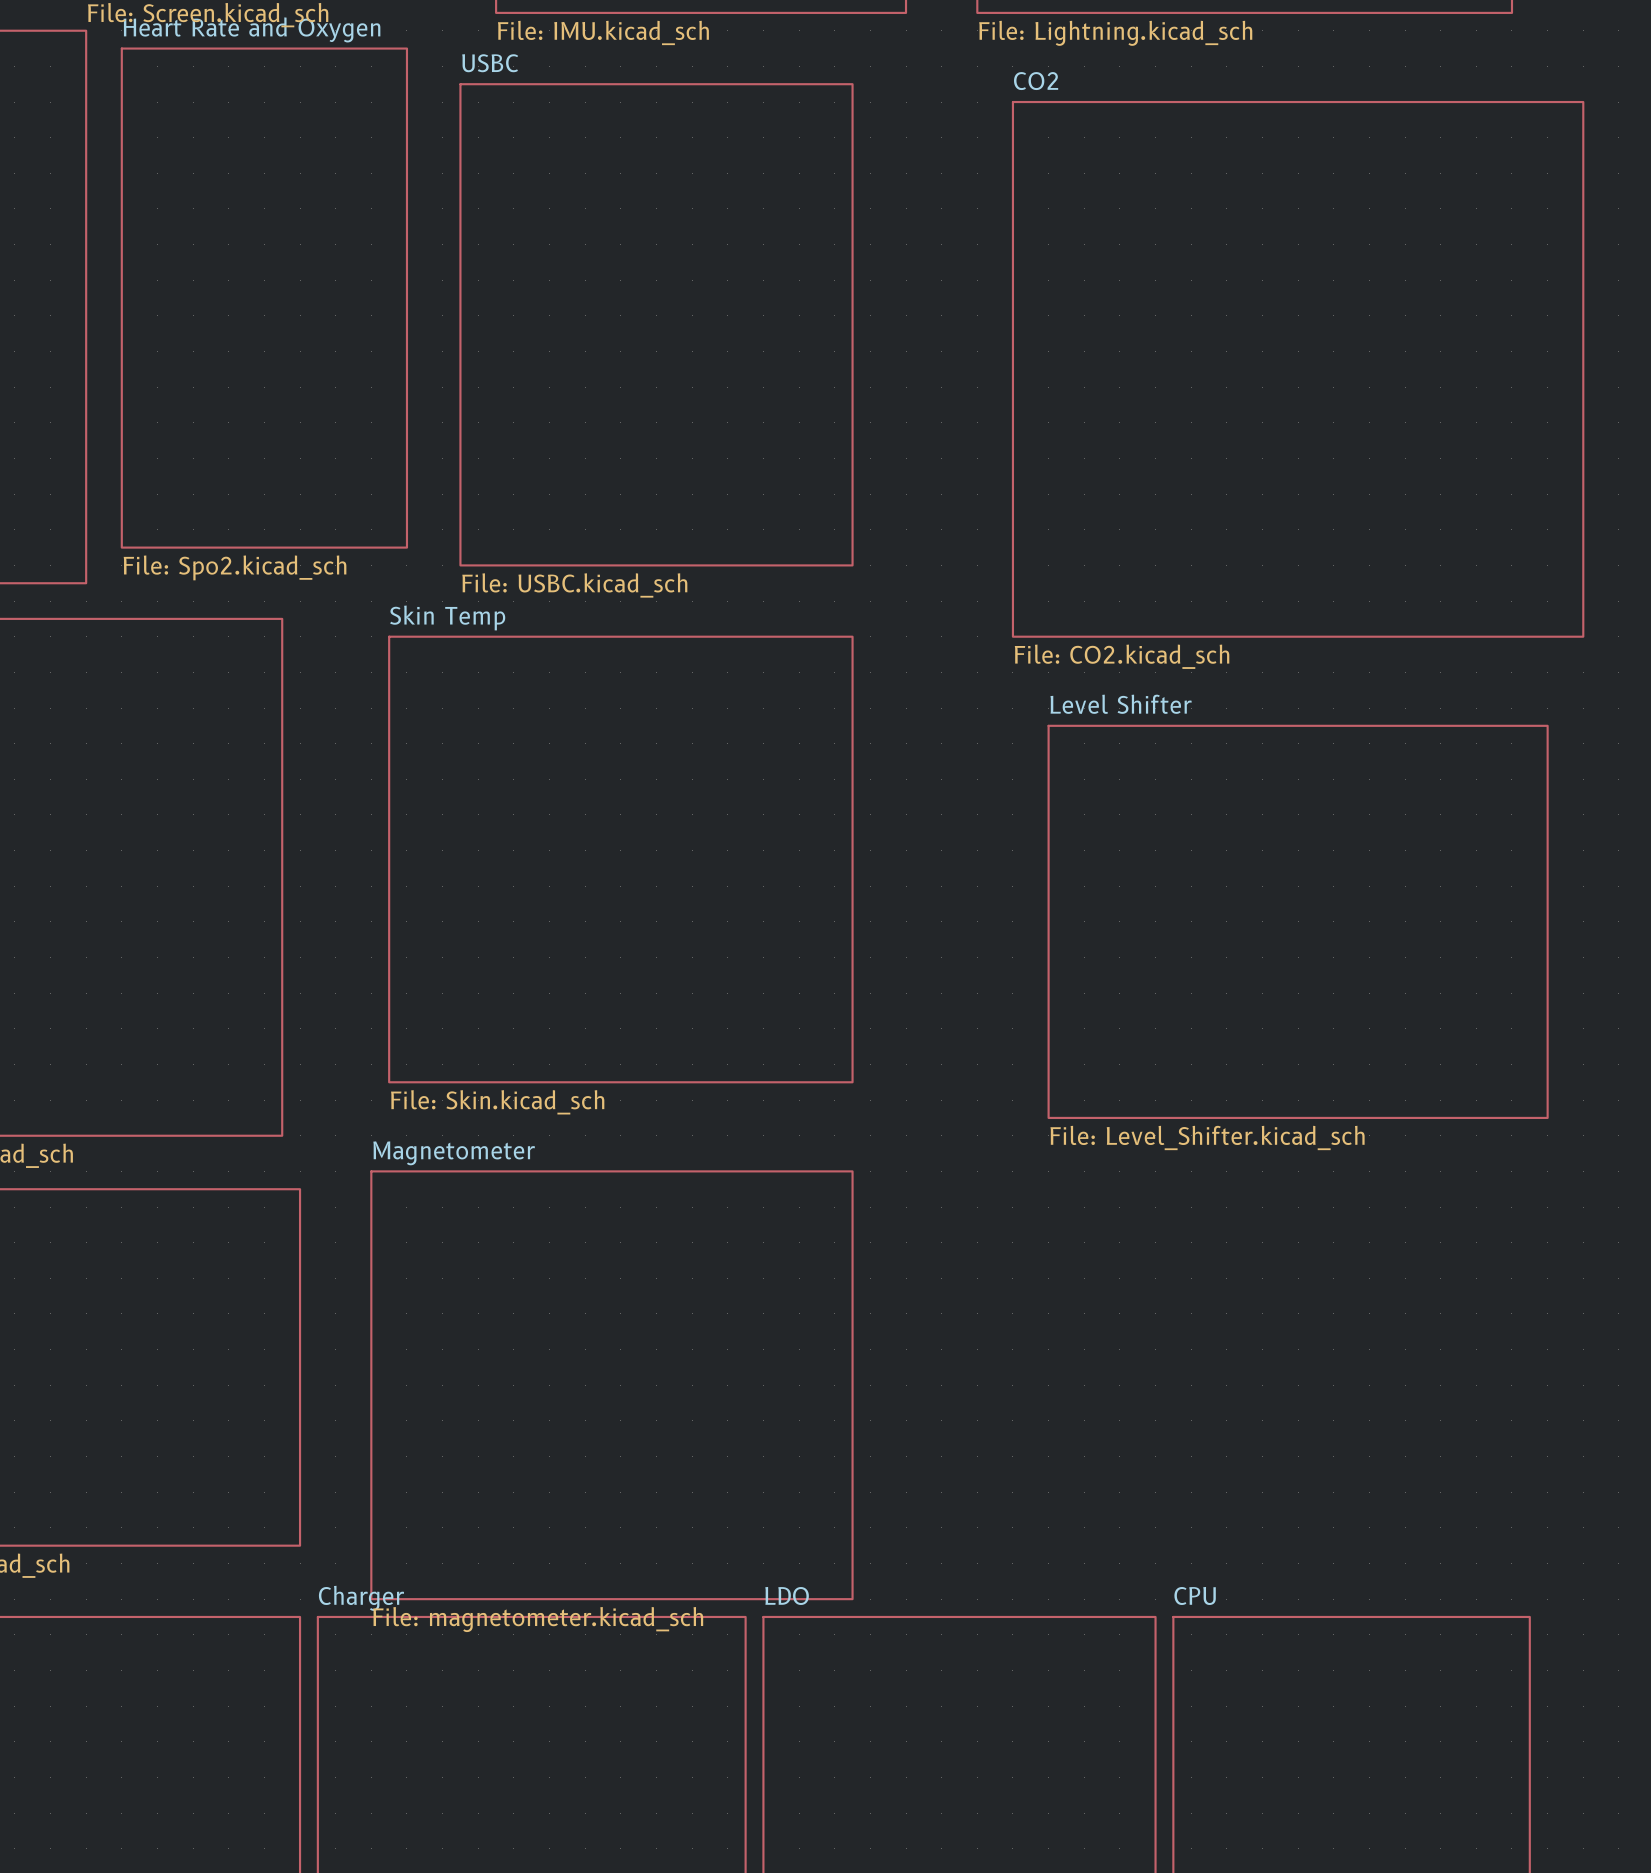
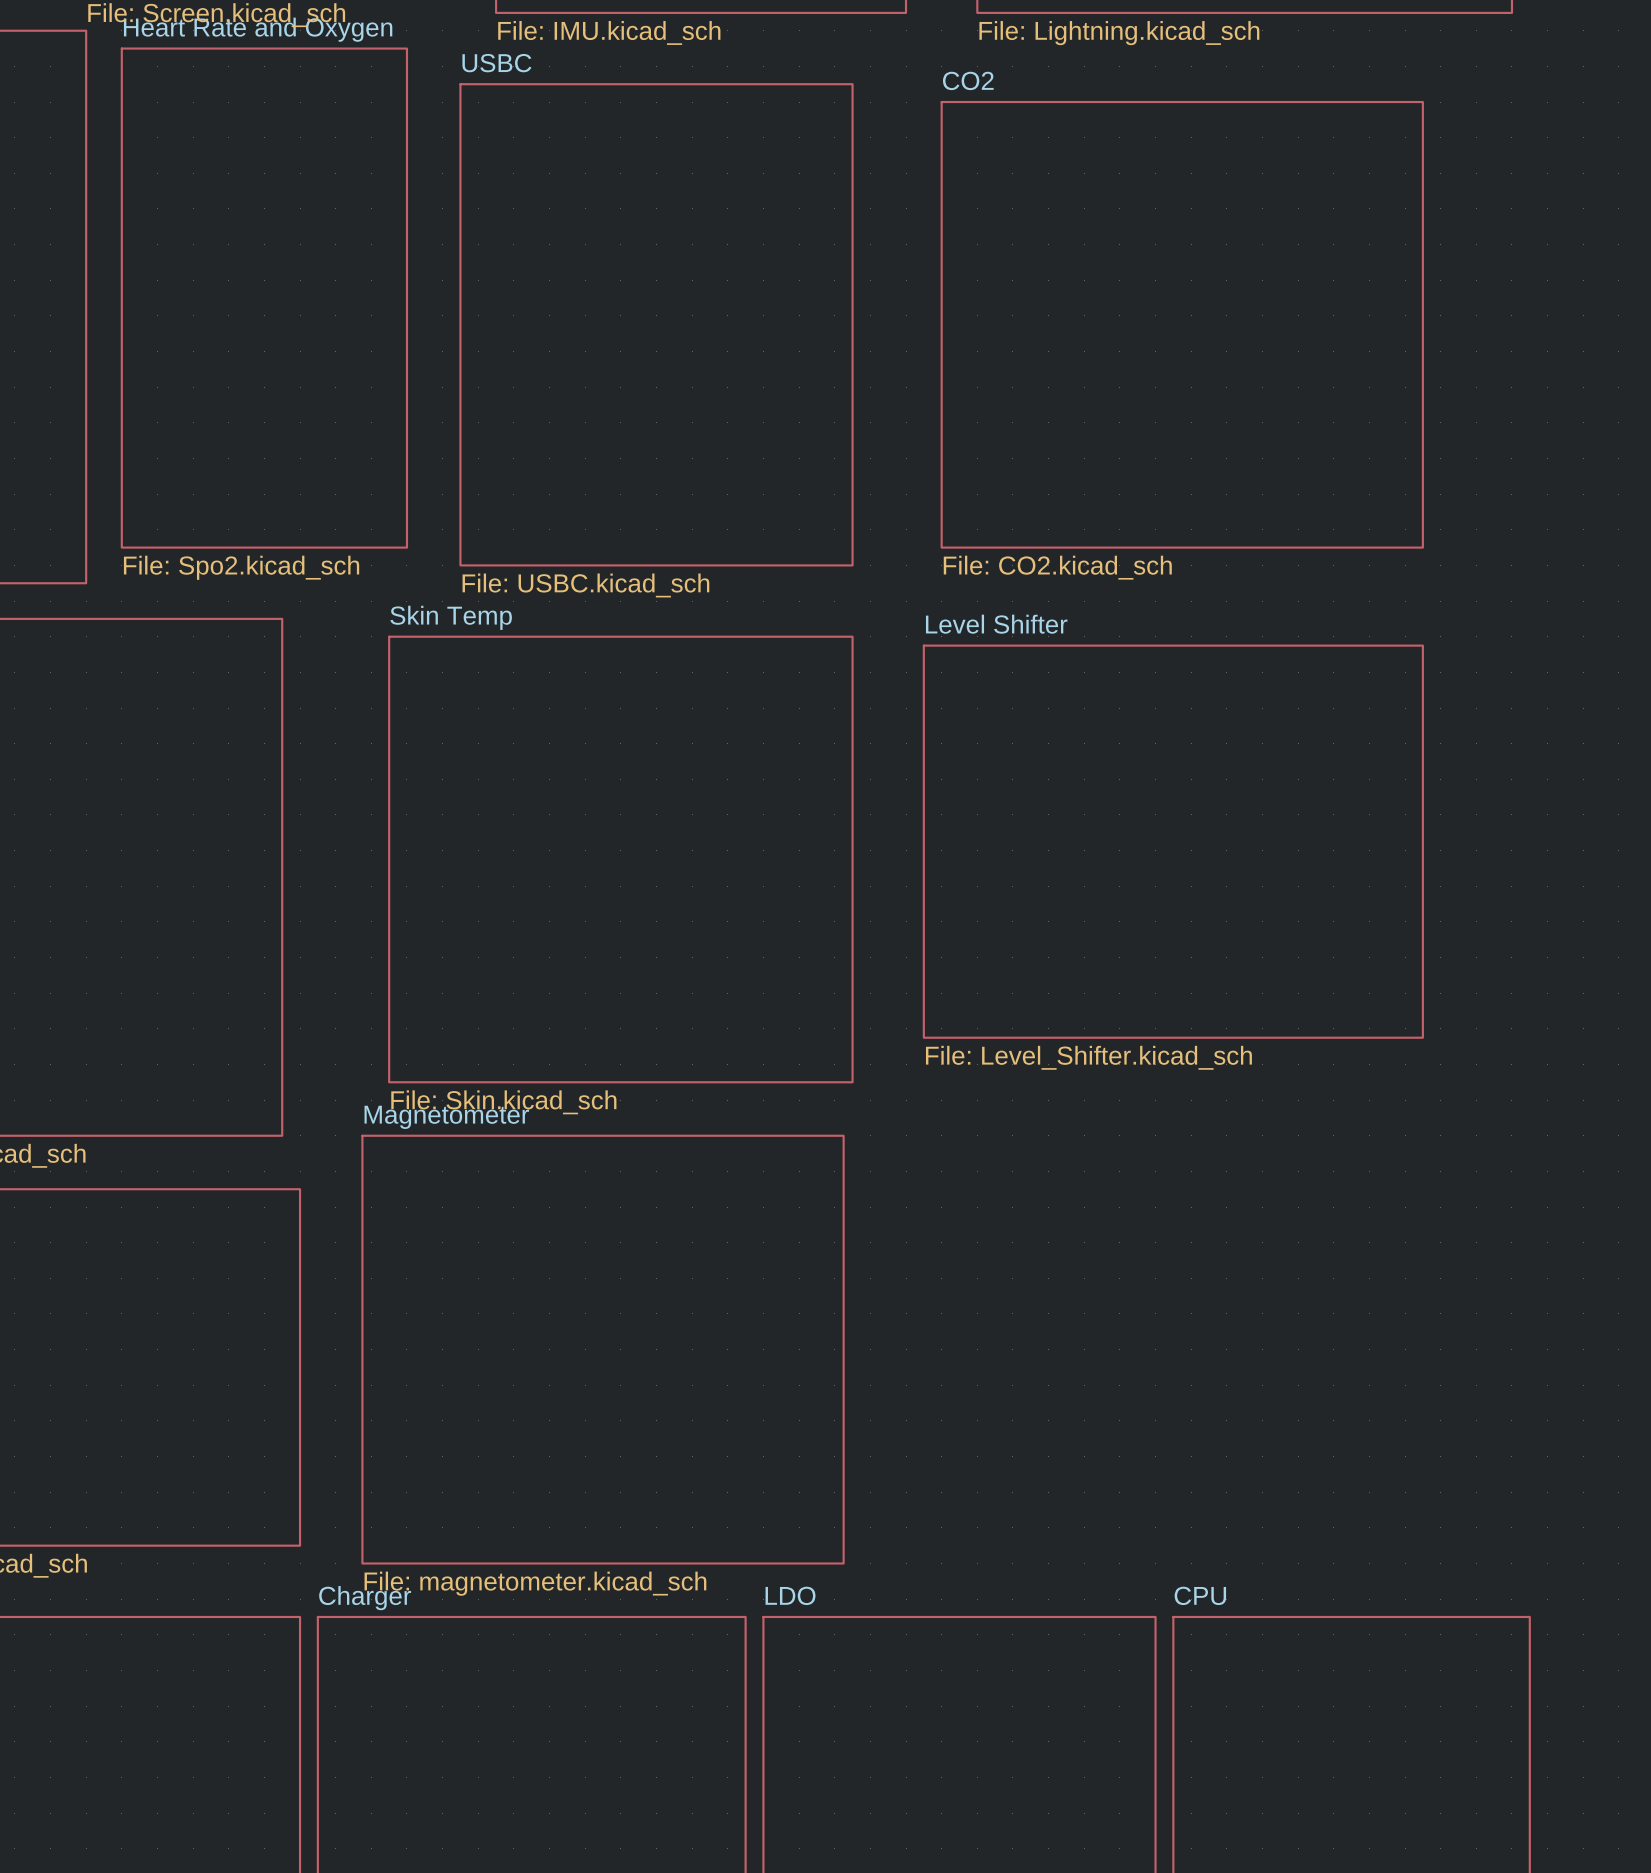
sheet CO2 name position: CO2 (1036, 81) -> CO2 (968, 80)
sheet CO2 shape: [1011, 100, 1585, 638] -> [940, 100, 1424, 549]
sheet CO2 value position: File: CO2.kicad_sch (1122, 656) -> File: CO2.kicad_sch (1057, 567)
sheet Level Shifter position: (1298, 921) -> (1173, 841)
sheet Magnetometer position: (611, 1385) -> (603, 1349)

